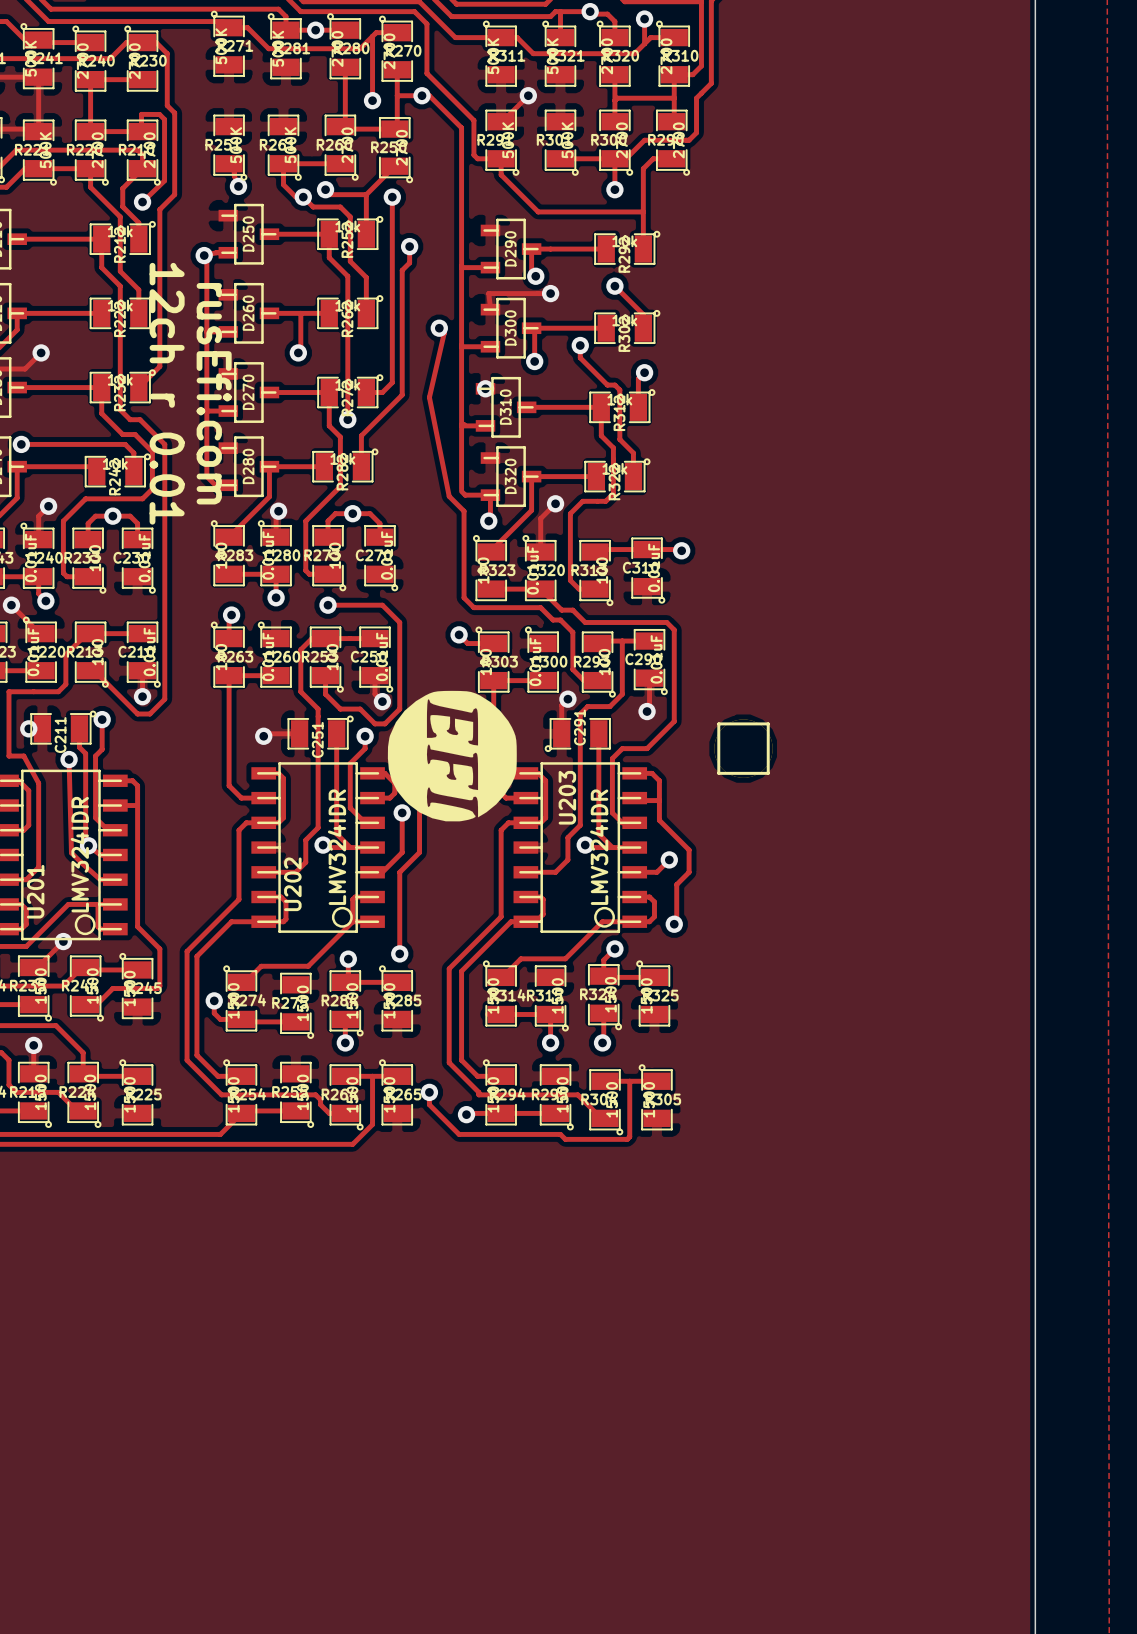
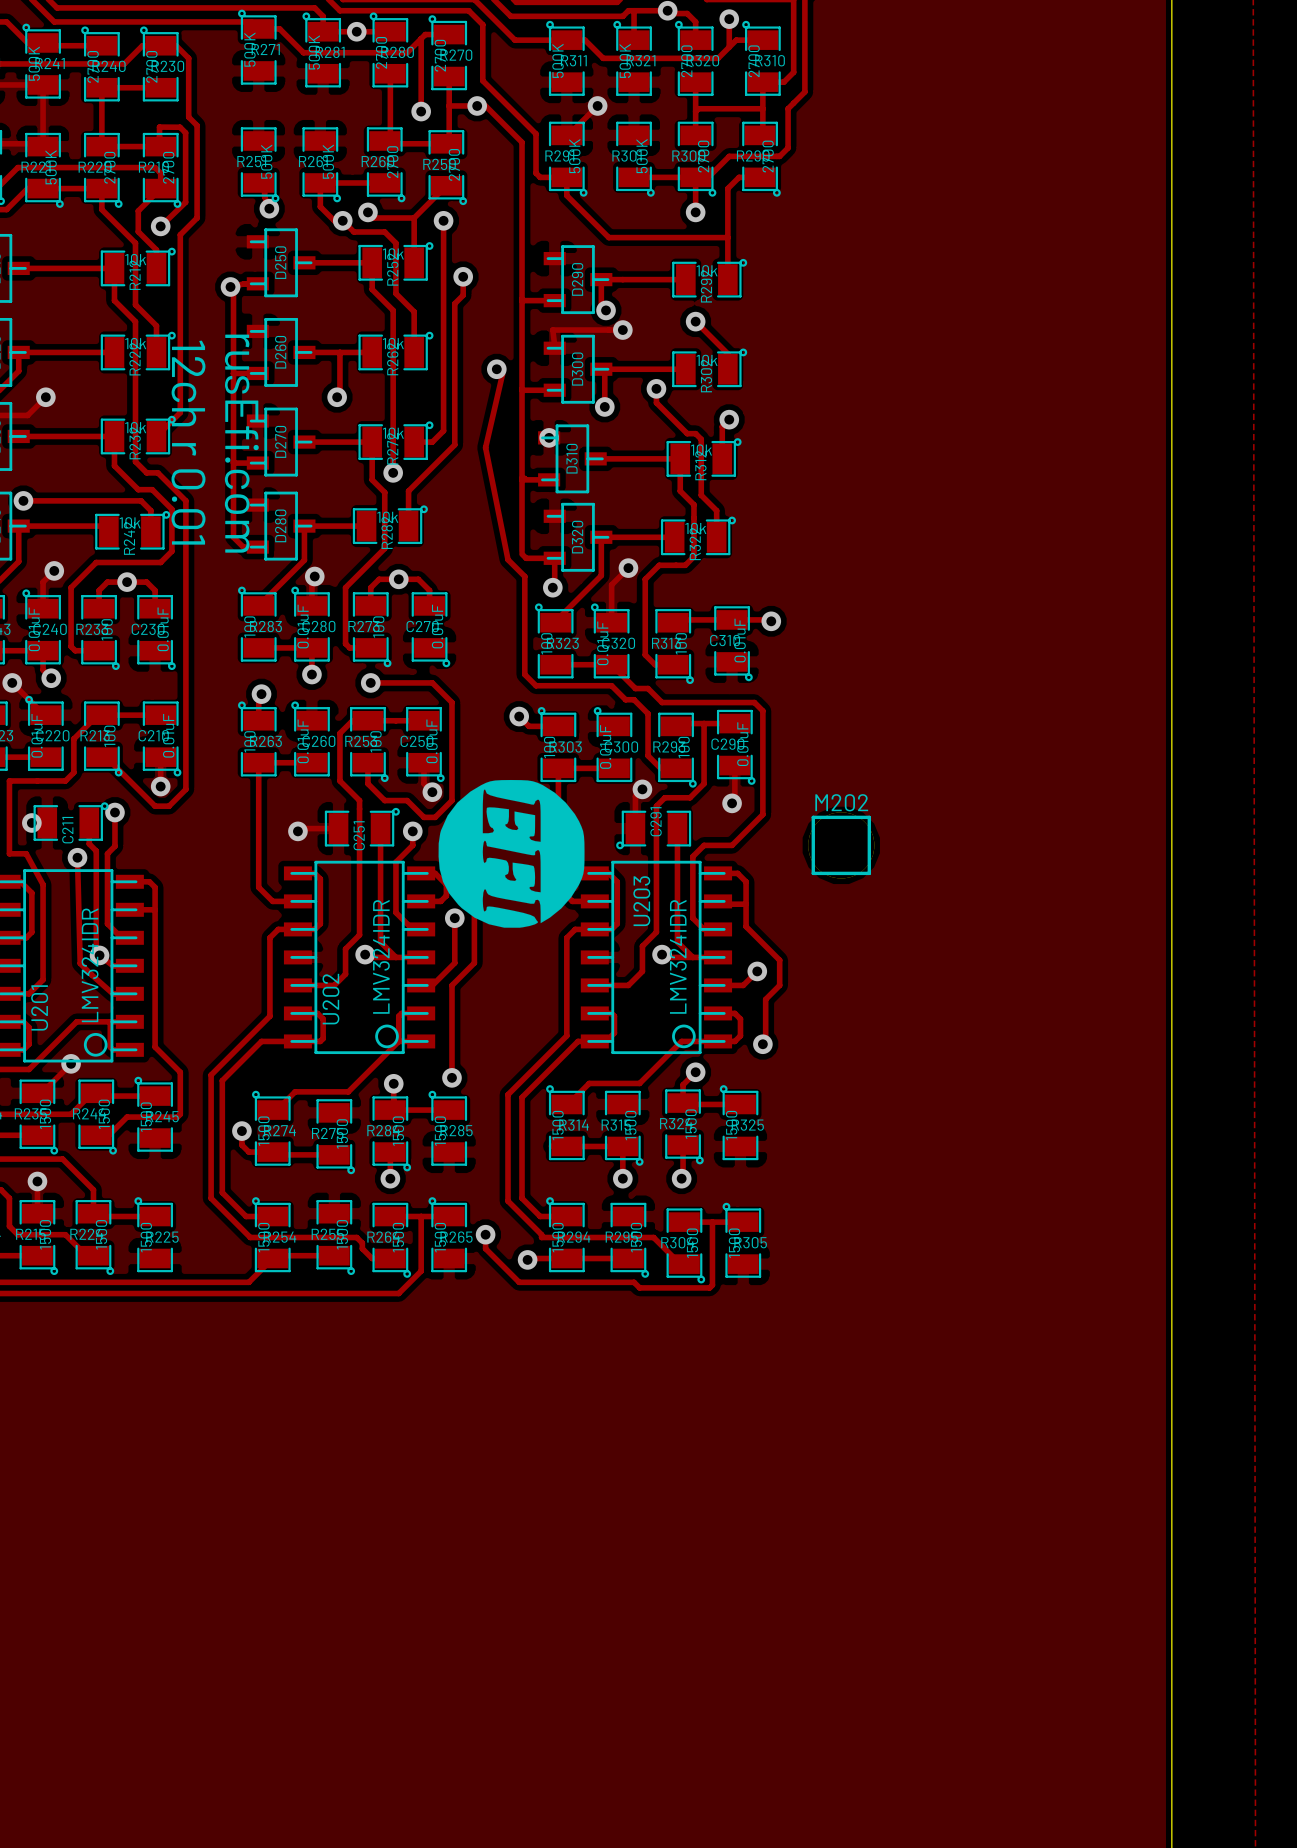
M202 name: none -> M202 (841, 802)

